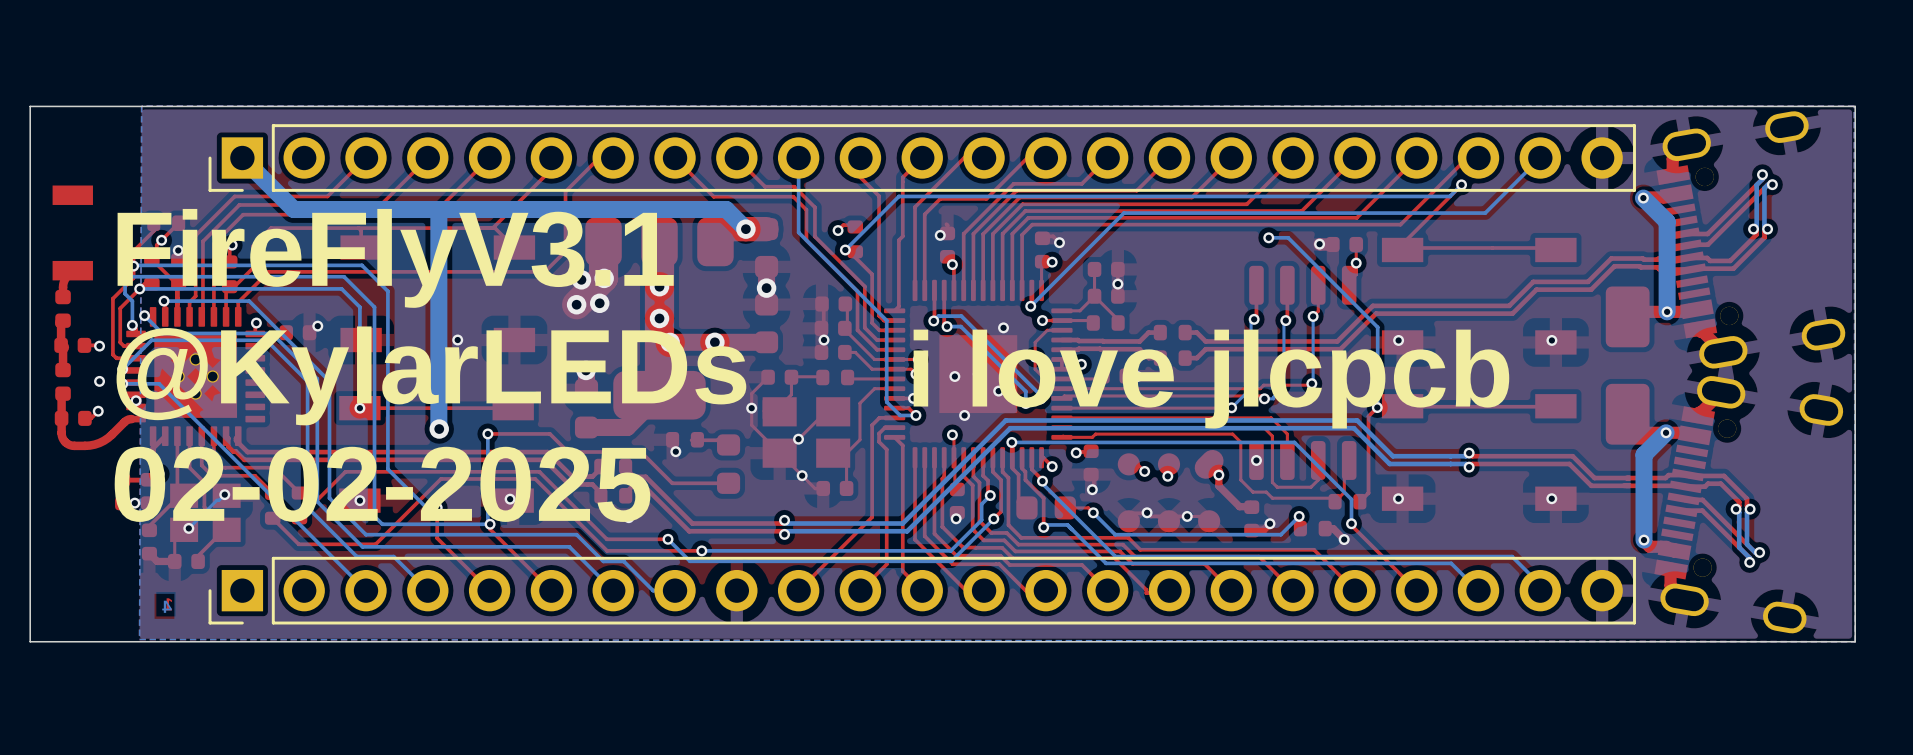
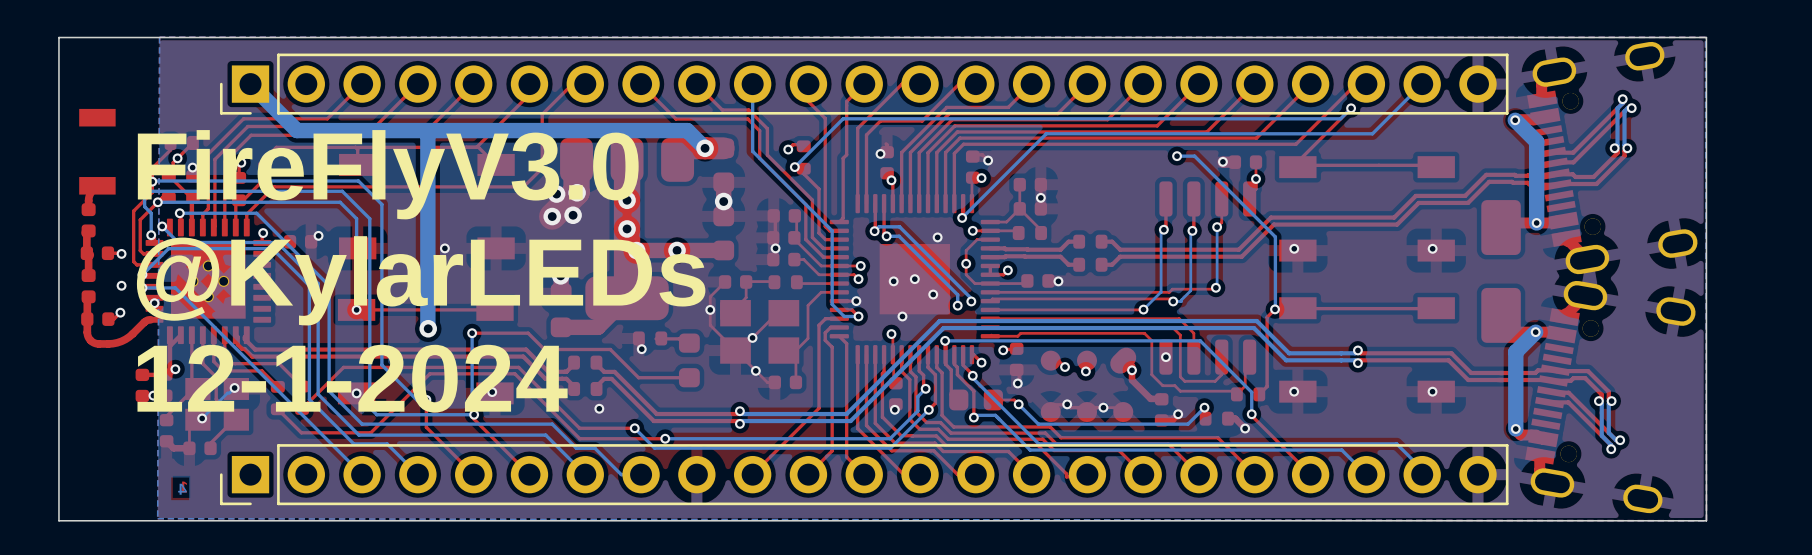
text: FireFlyV3.1 (395, 258) -> FireFlyV3.0 (388, 174)
text: i love jlcpcb (1211, 379) -> none
text: 02-02-2025 (382, 484) -> 12-1-2024 (352, 378)

